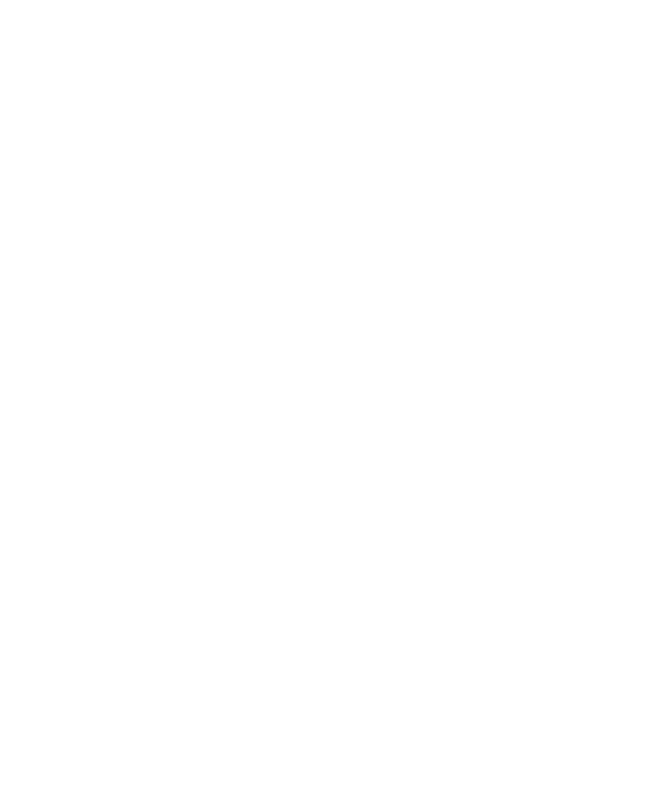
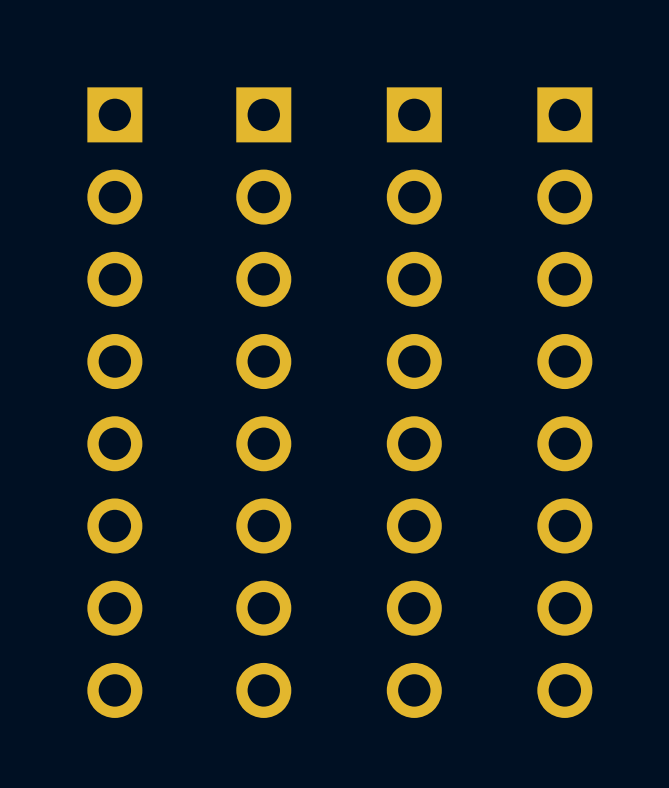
part: none -> (114, 402)
part: none -> (263, 402)
part: none -> (414, 402)
part: none -> (564, 402)

